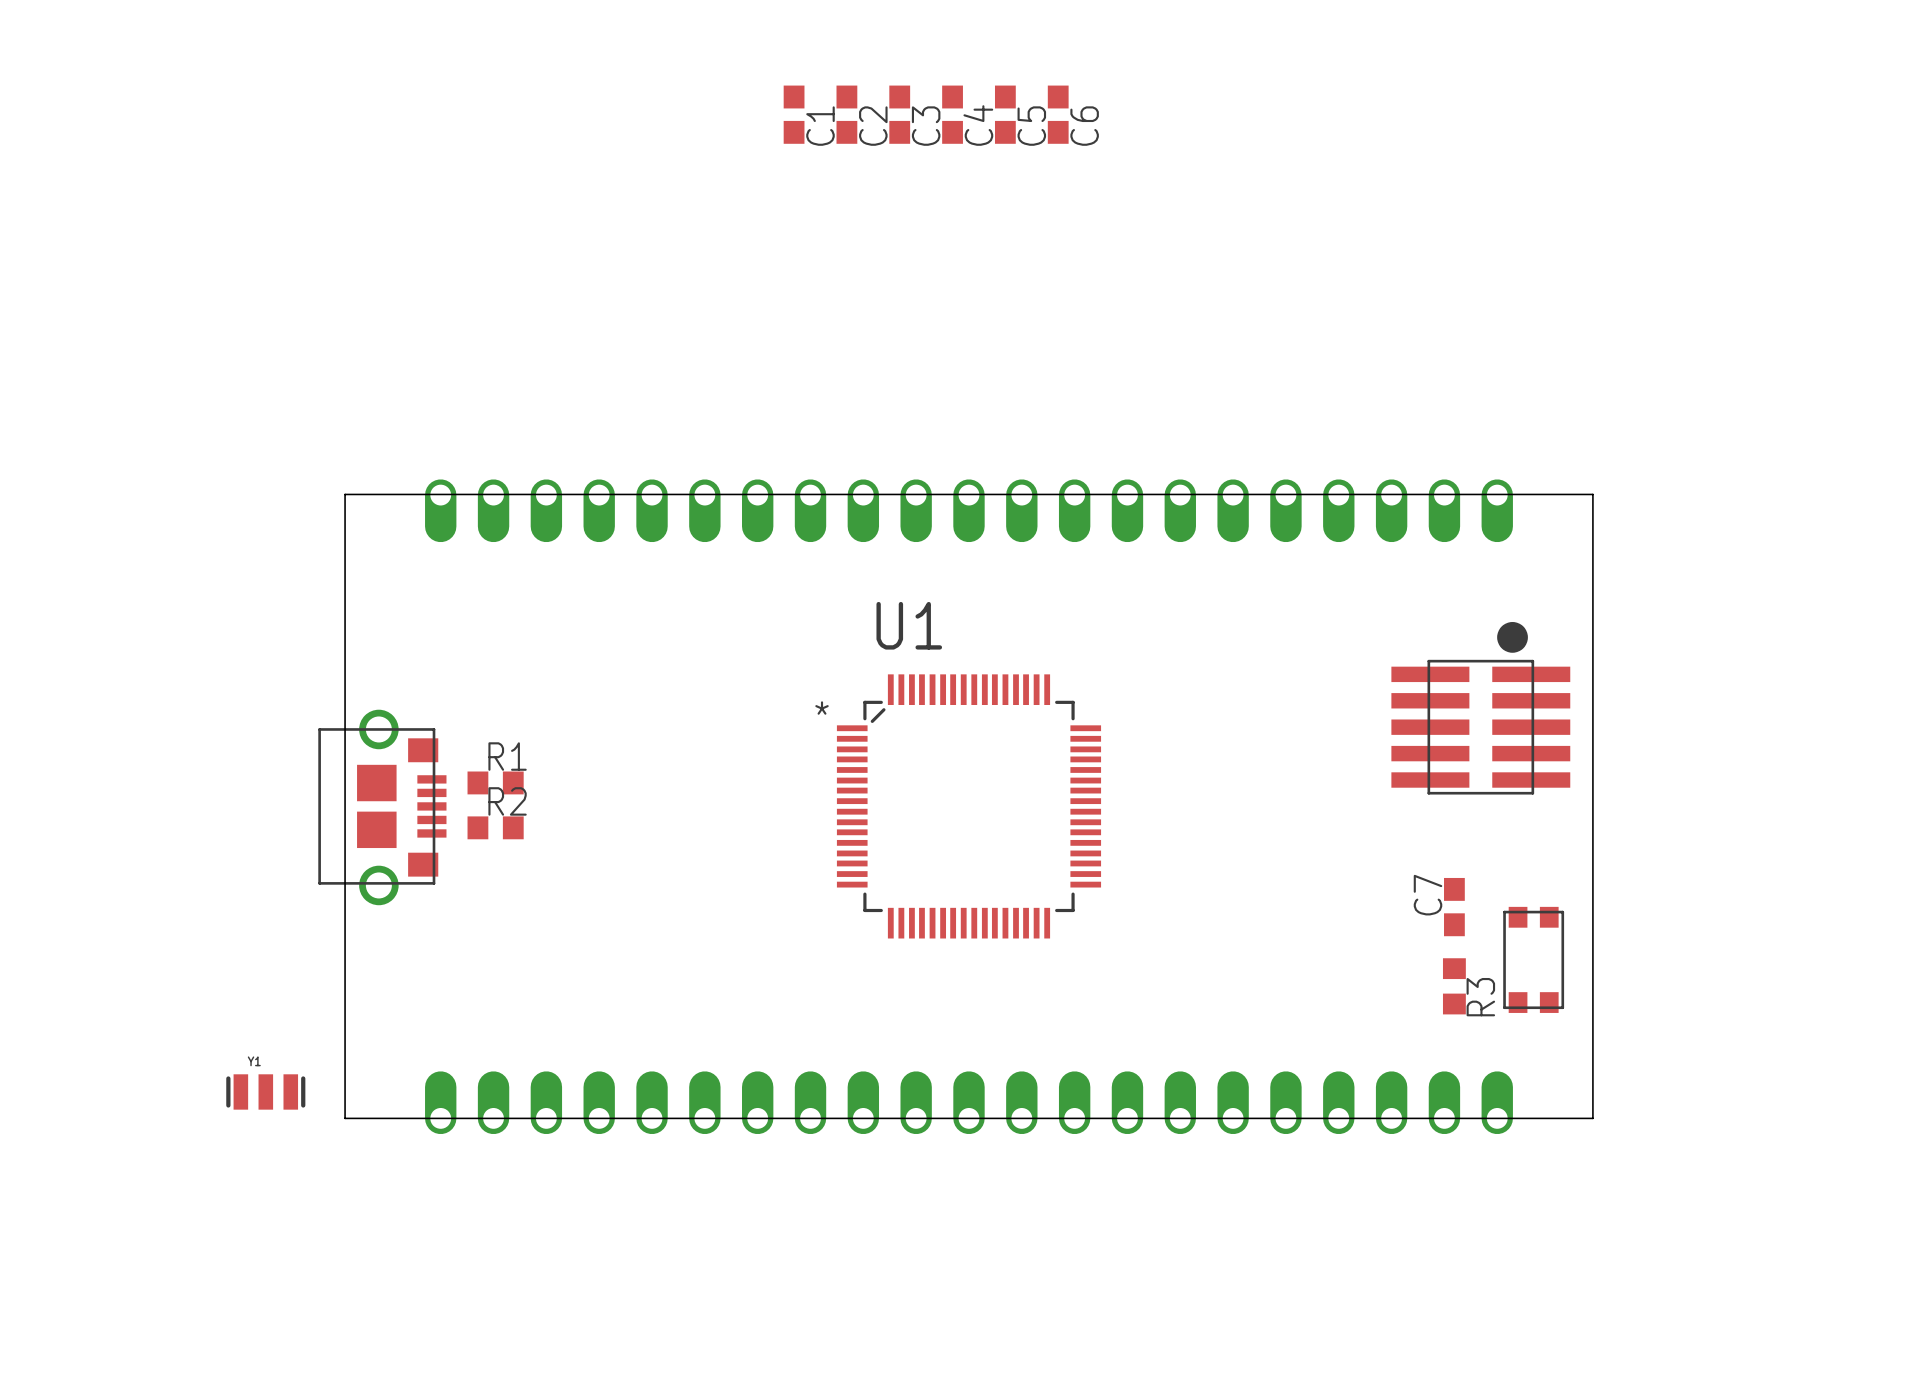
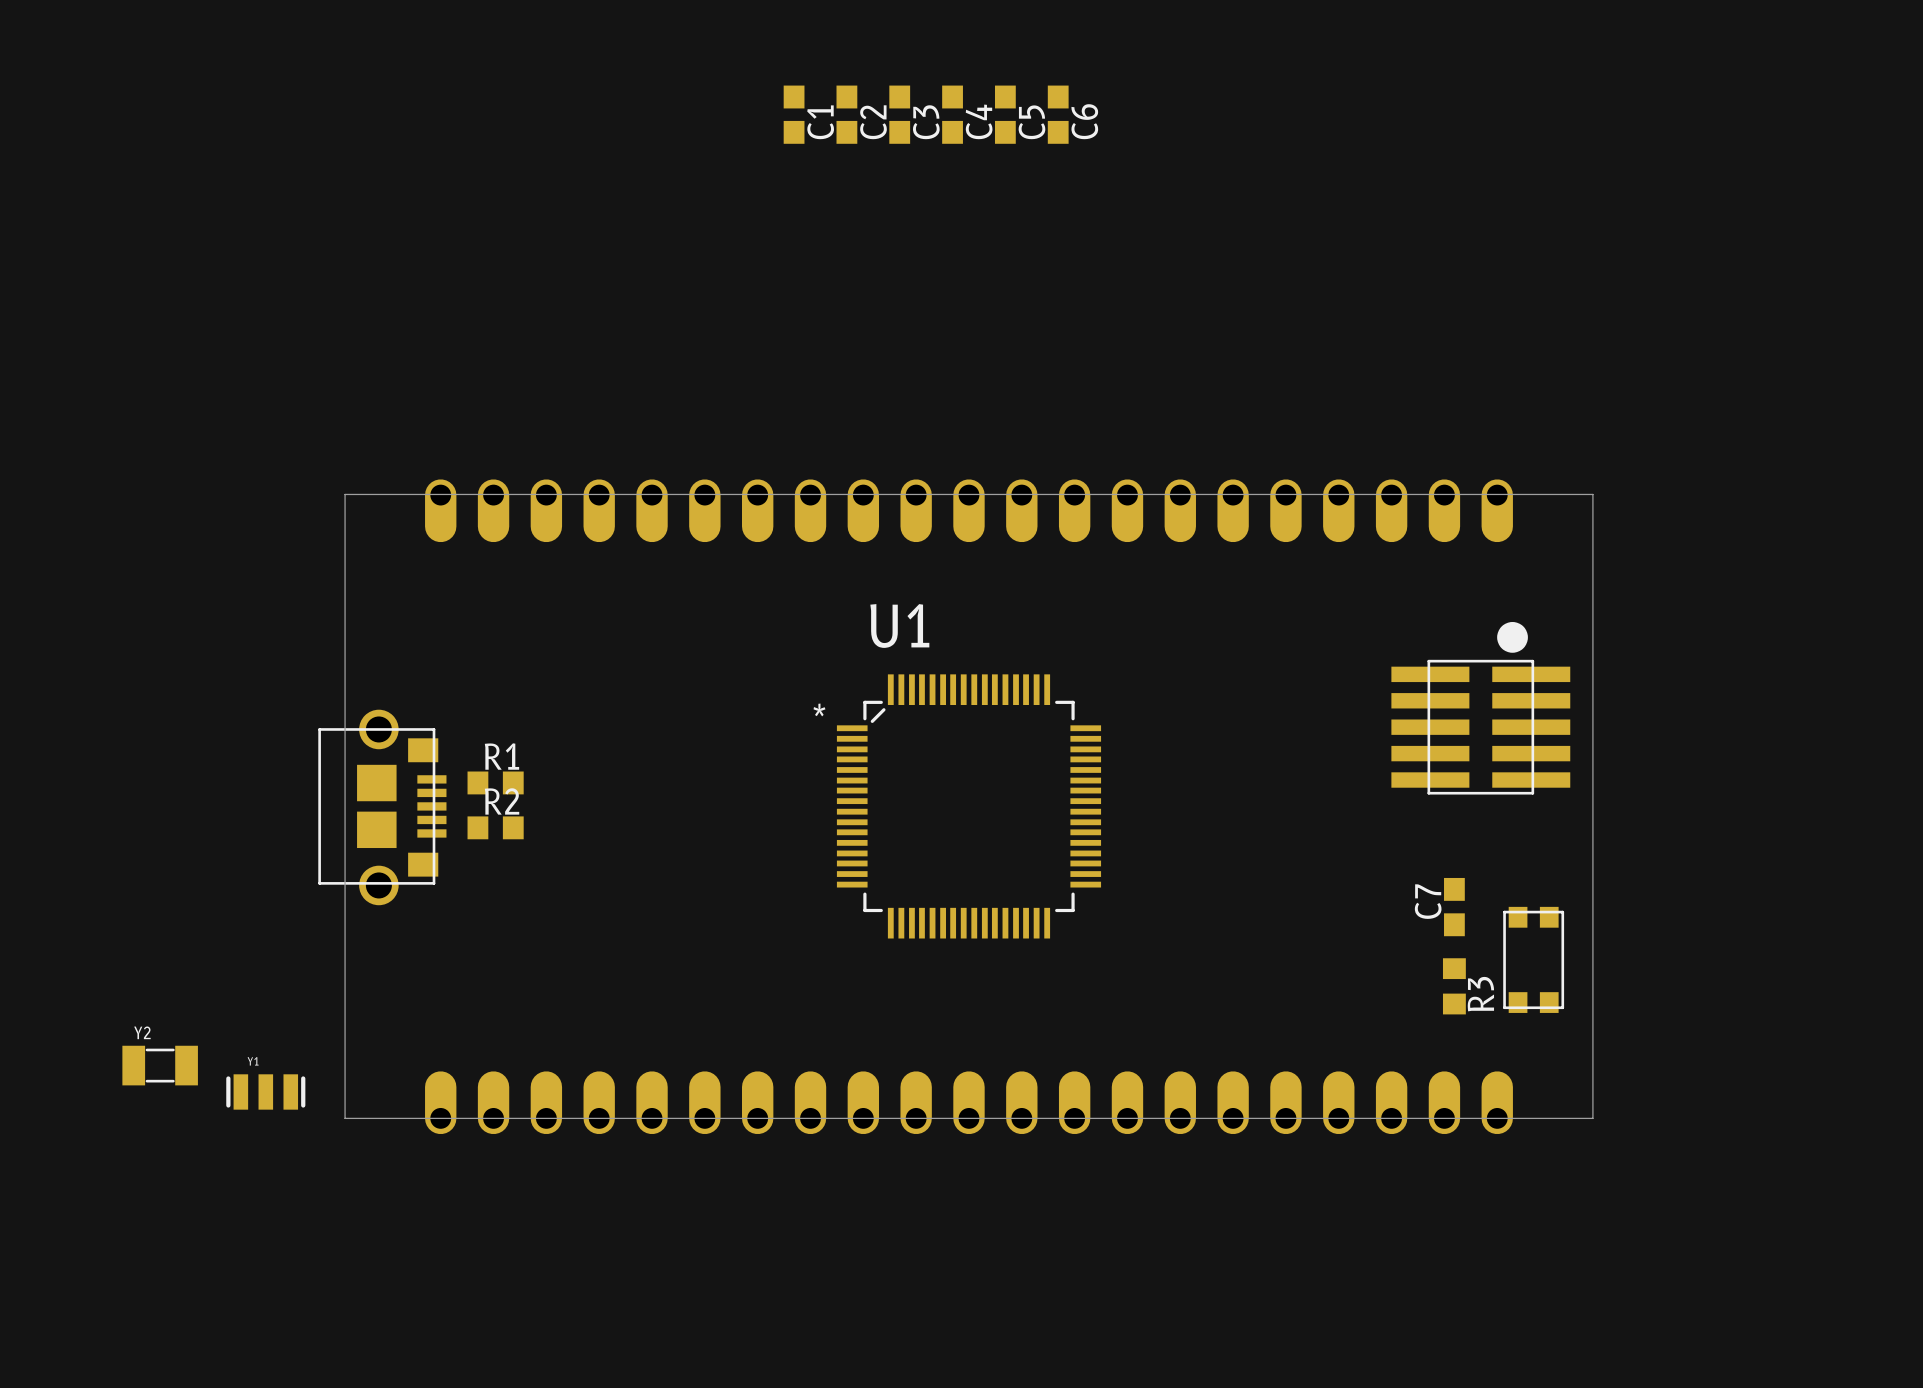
Y2: none -> (160, 1065)

